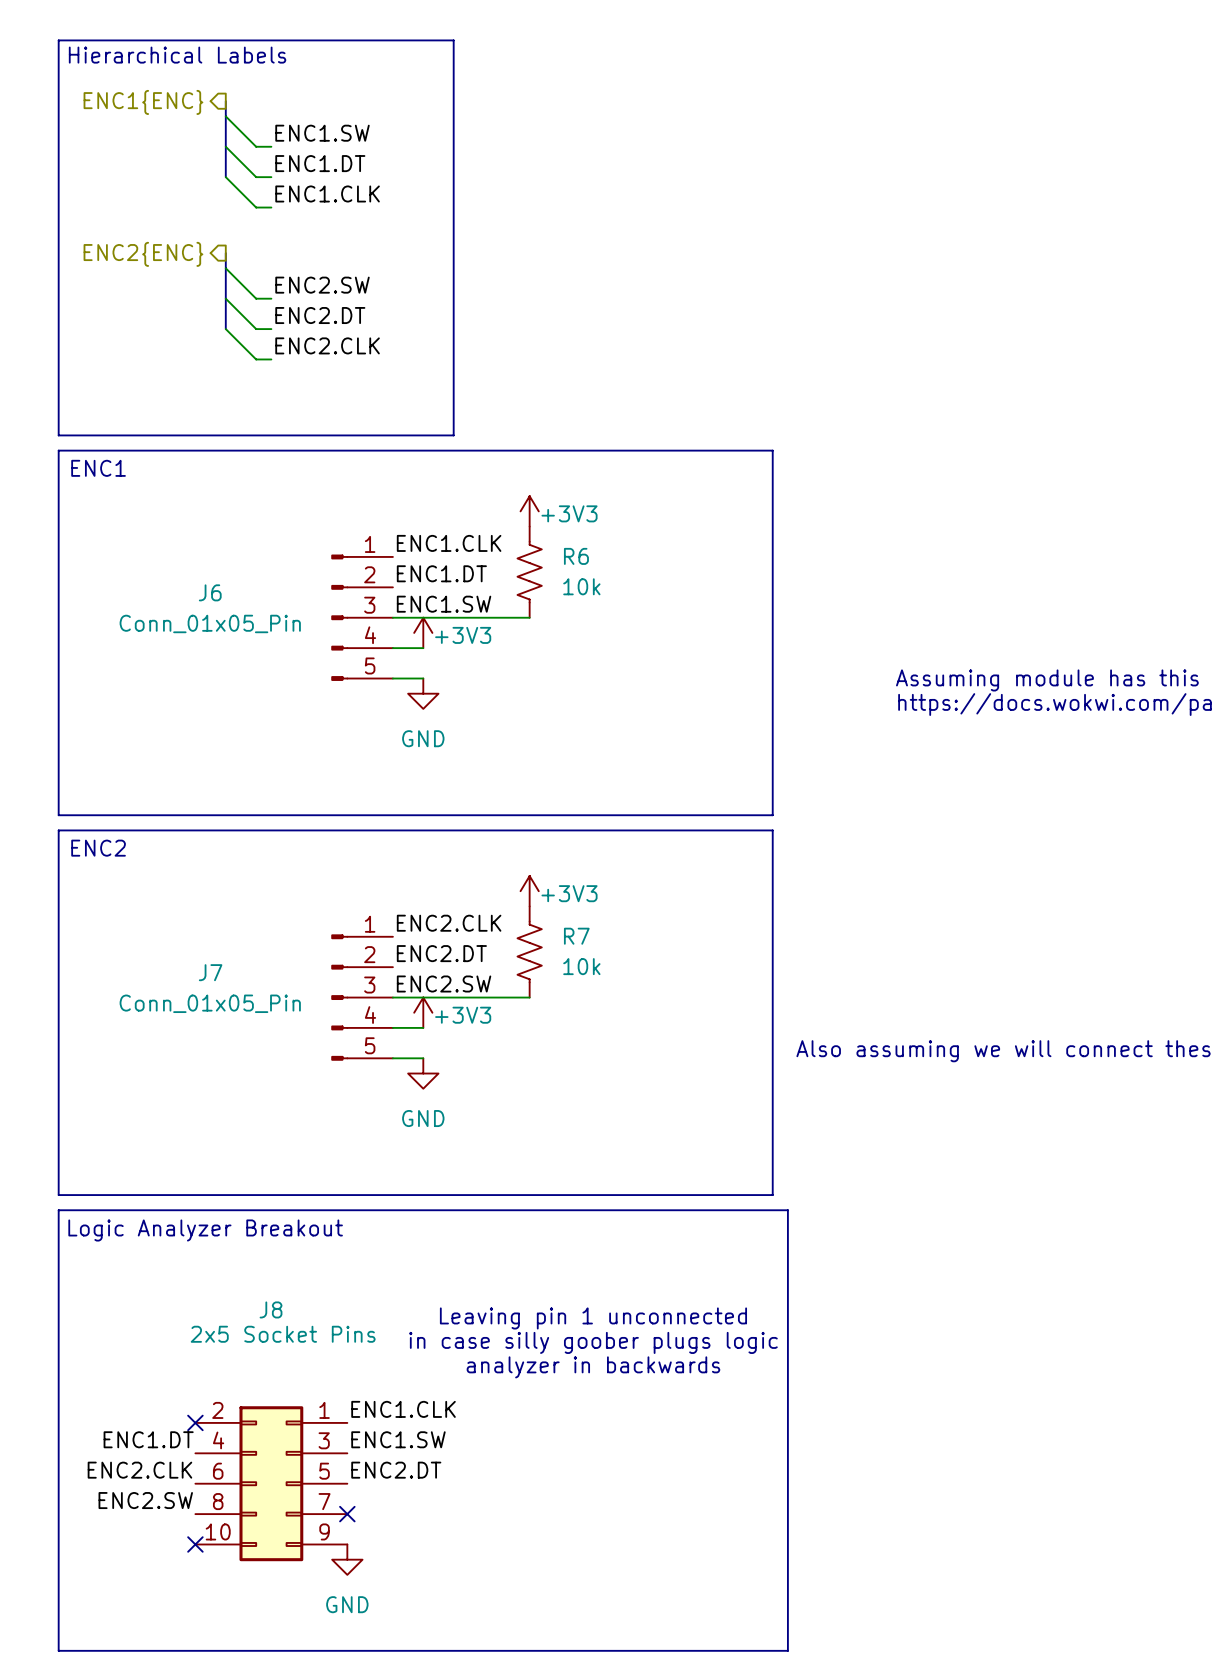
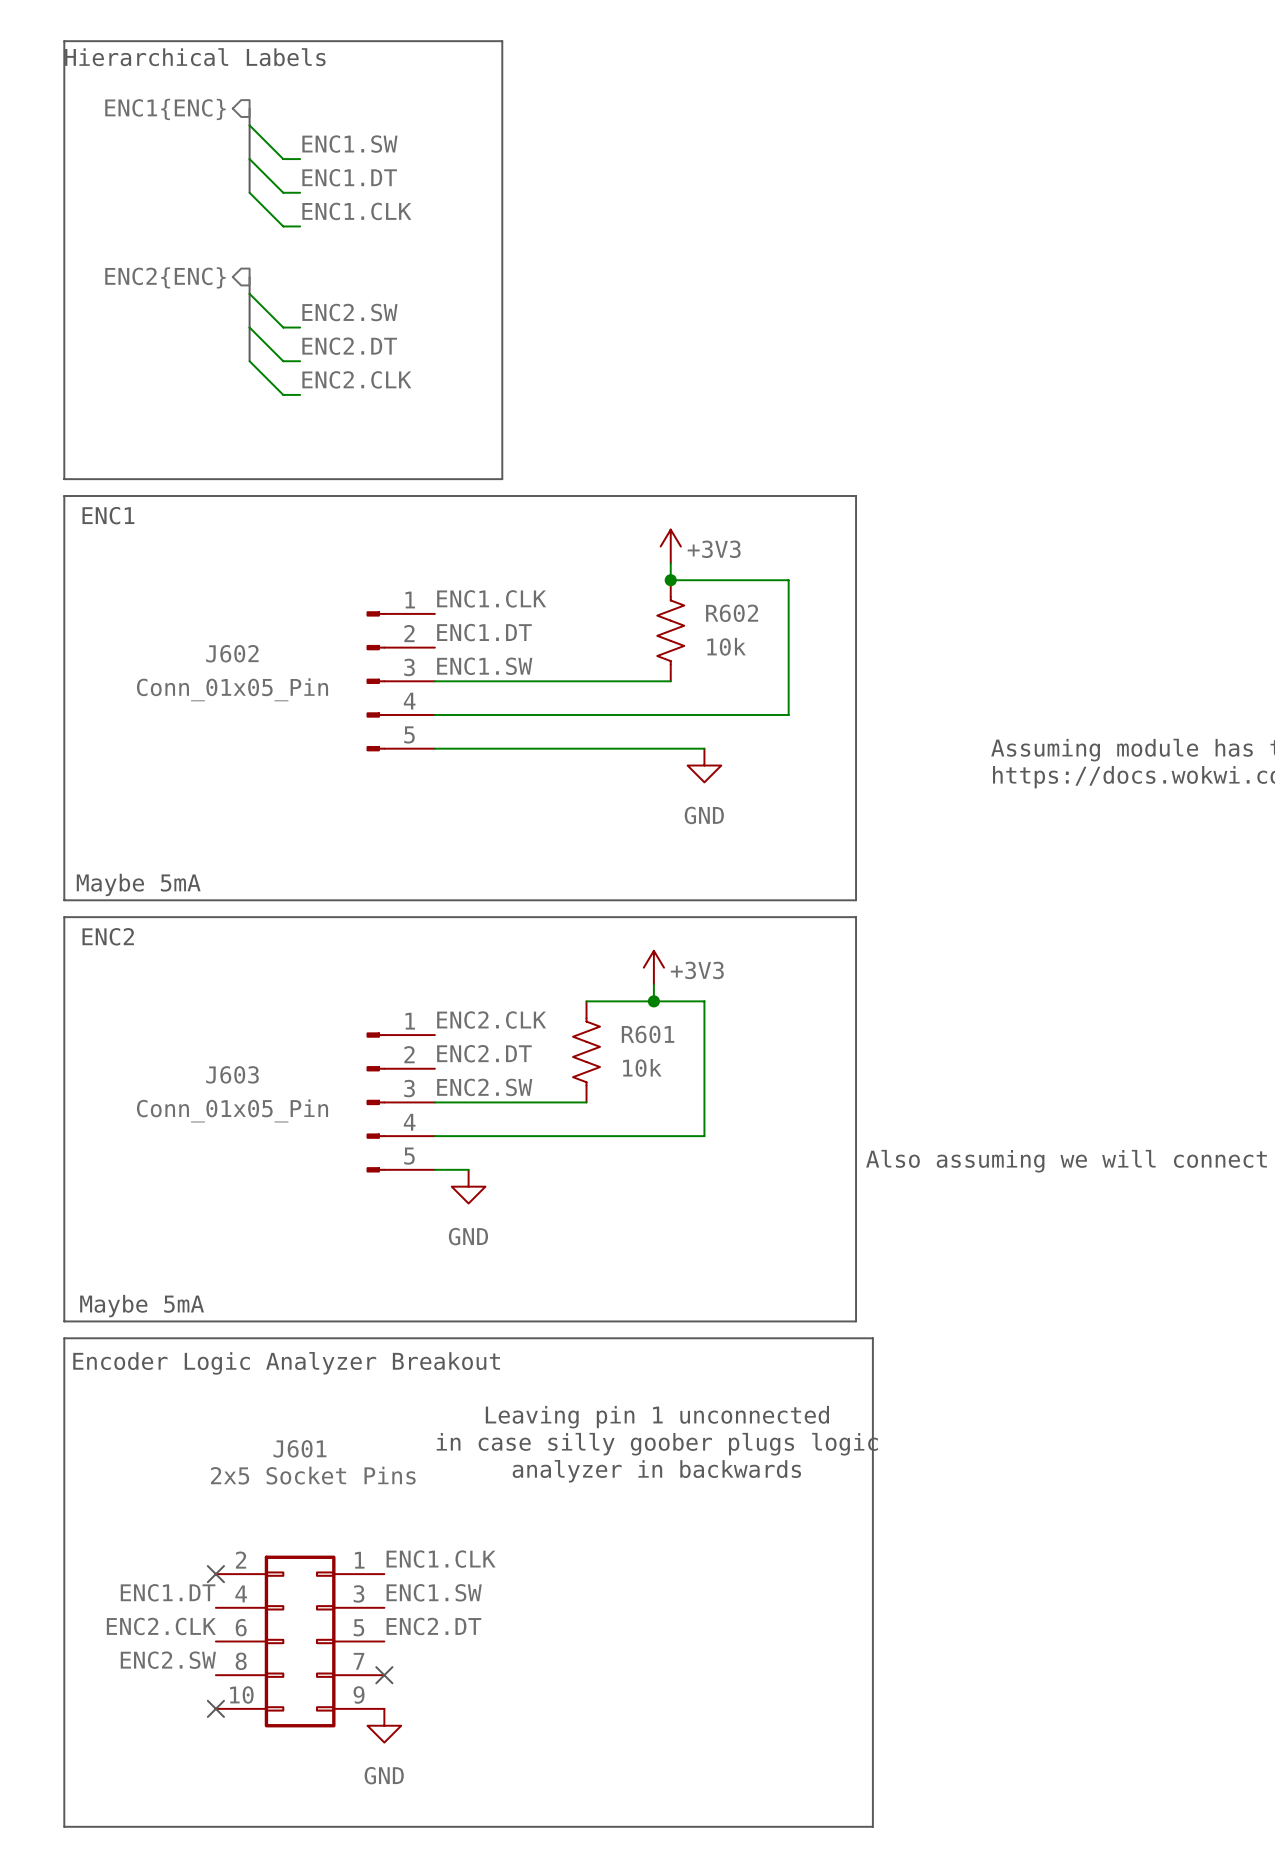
power symbol position: +3V3 (529, 511) -> +3V3 (670, 546)
wire: none -> (670, 563) (670, 580) (788, 580) (788, 714) (468, 714)
junction: none -> (670, 580)
R6: 10k (529, 572) -> none
R602: none -> 10k (670, 630)
J6 name: J6 (210, 592) -> J602 (232, 653)
wire: none -> (586, 681) (670, 681)
power symbol: +3V3 (423, 632) -> none
wire: none -> (468, 748) (704, 748)
power symbol position: GND (423, 693) -> GND (704, 765)
text: none -> Maybe 5mA (138, 884)
power symbol position: +3V3 (529, 891) -> +3V3 (653, 967)
wire: none -> (653, 984) (653, 1001)
wire: none -> (586, 1001) (704, 1001) (704, 1136) (468, 1136)
junction: none -> (653, 1001)
R7 name: R7 (576, 936) -> R601 (648, 1034)
J7 name: J7 (210, 972) -> J603 (232, 1074)
power symbol: +3V3 (423, 1012) -> none
text: none -> Maybe 5mA (142, 1306)
text: Logic Analyzer Breakout (205, 1230) -> Encoder Logic Analyzer Breakout (286, 1363)
J8 name: J8 (271, 1309) -> J601 (299, 1448)
text position: Leaving pin 1 unconnected (593, 1318) -> Leaving pin 1 unconnected (657, 1417)
text position: in case silly goober plugs logic (593, 1342) -> in case silly goober plugs logic (657, 1444)
text position: analyzer in backwards (593, 1367) -> analyzer in backwards (656, 1471)

